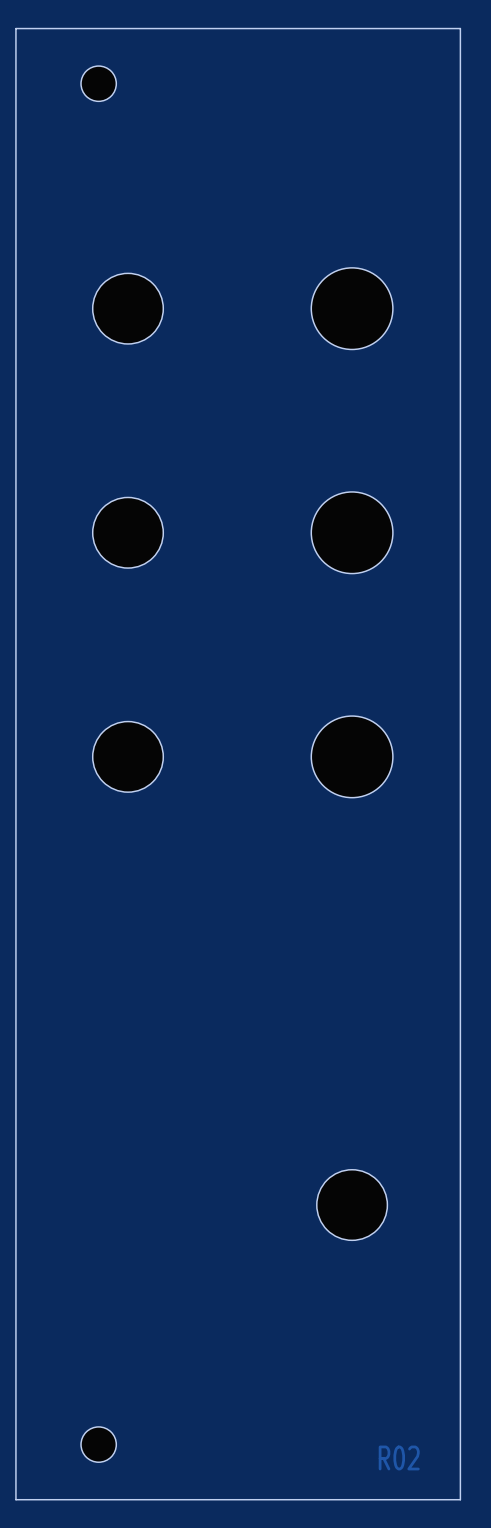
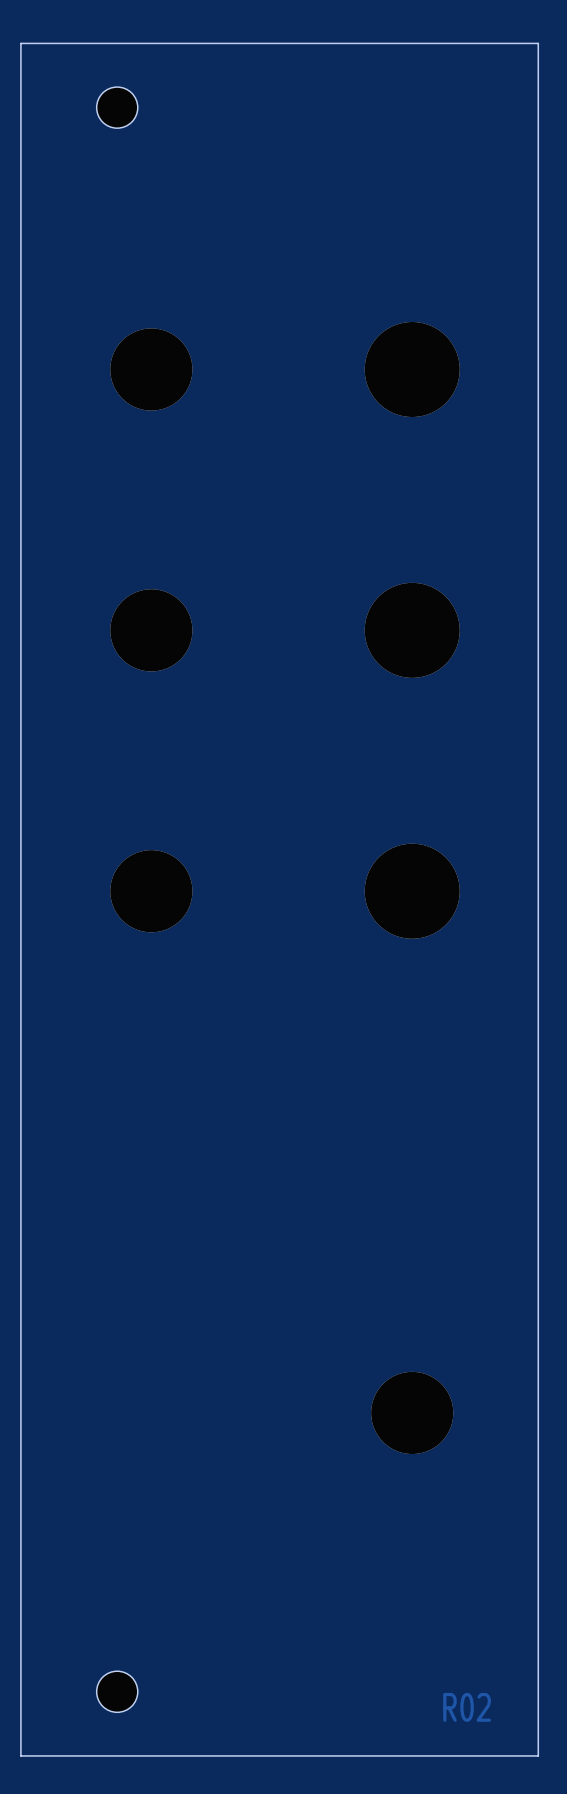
part footprint: [311, 267, 393, 350] -> [364, 322, 460, 418]
part footprint: [92, 273, 164, 344] -> [110, 328, 193, 411]
part footprint: [311, 491, 393, 574] -> [364, 582, 460, 678]
part footprint: [92, 497, 164, 569] -> [110, 589, 193, 672]
part footprint: [311, 716, 393, 798] -> [364, 843, 460, 939]
part footprint: [92, 721, 164, 793] -> [110, 850, 193, 933]
part footprint: [316, 1169, 388, 1241] -> [371, 1371, 454, 1455]

